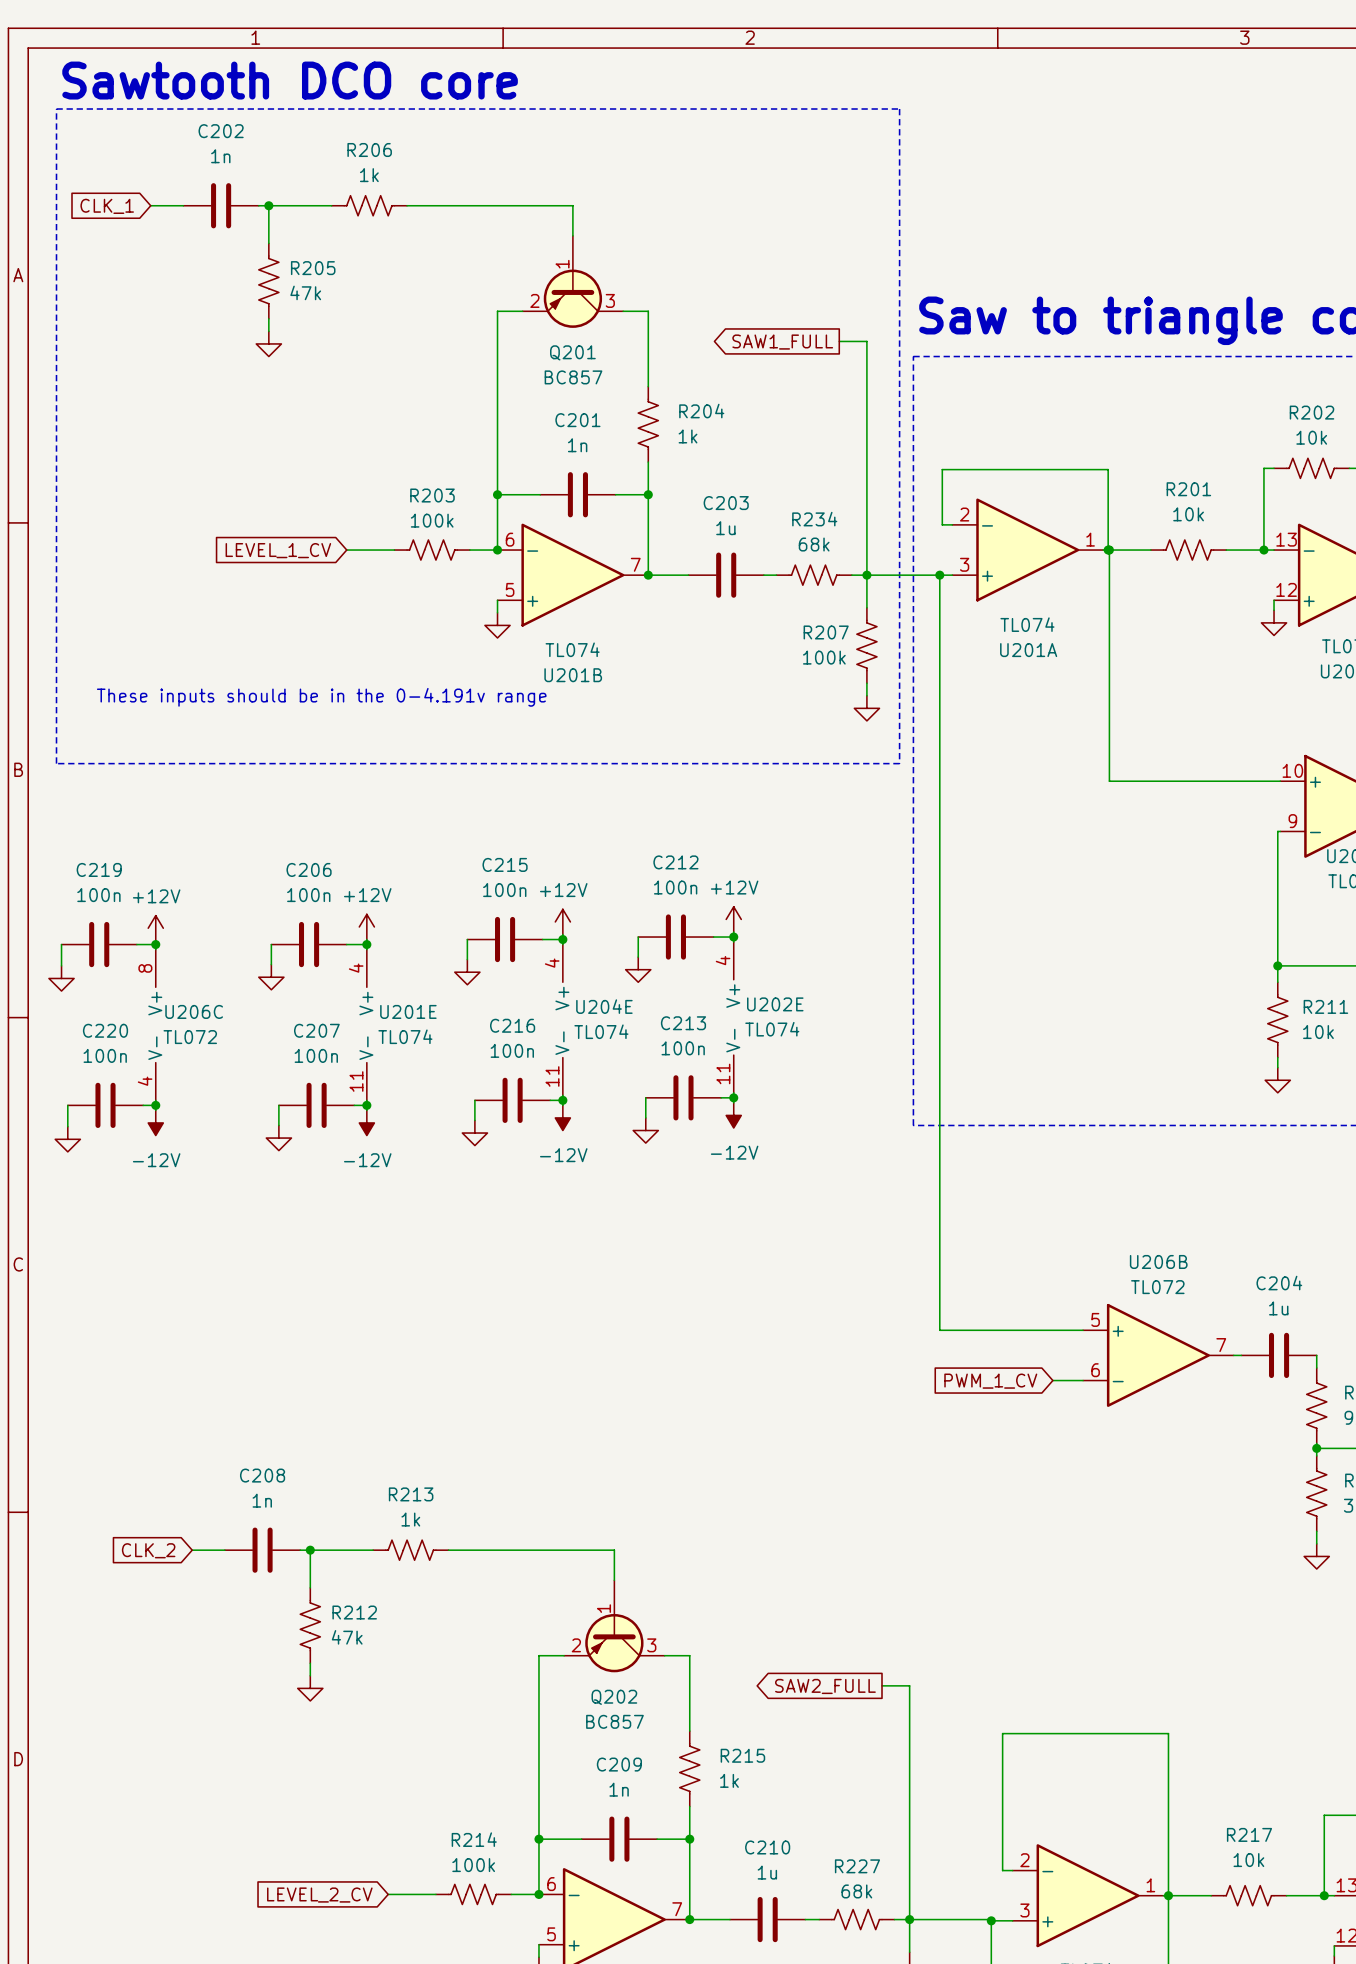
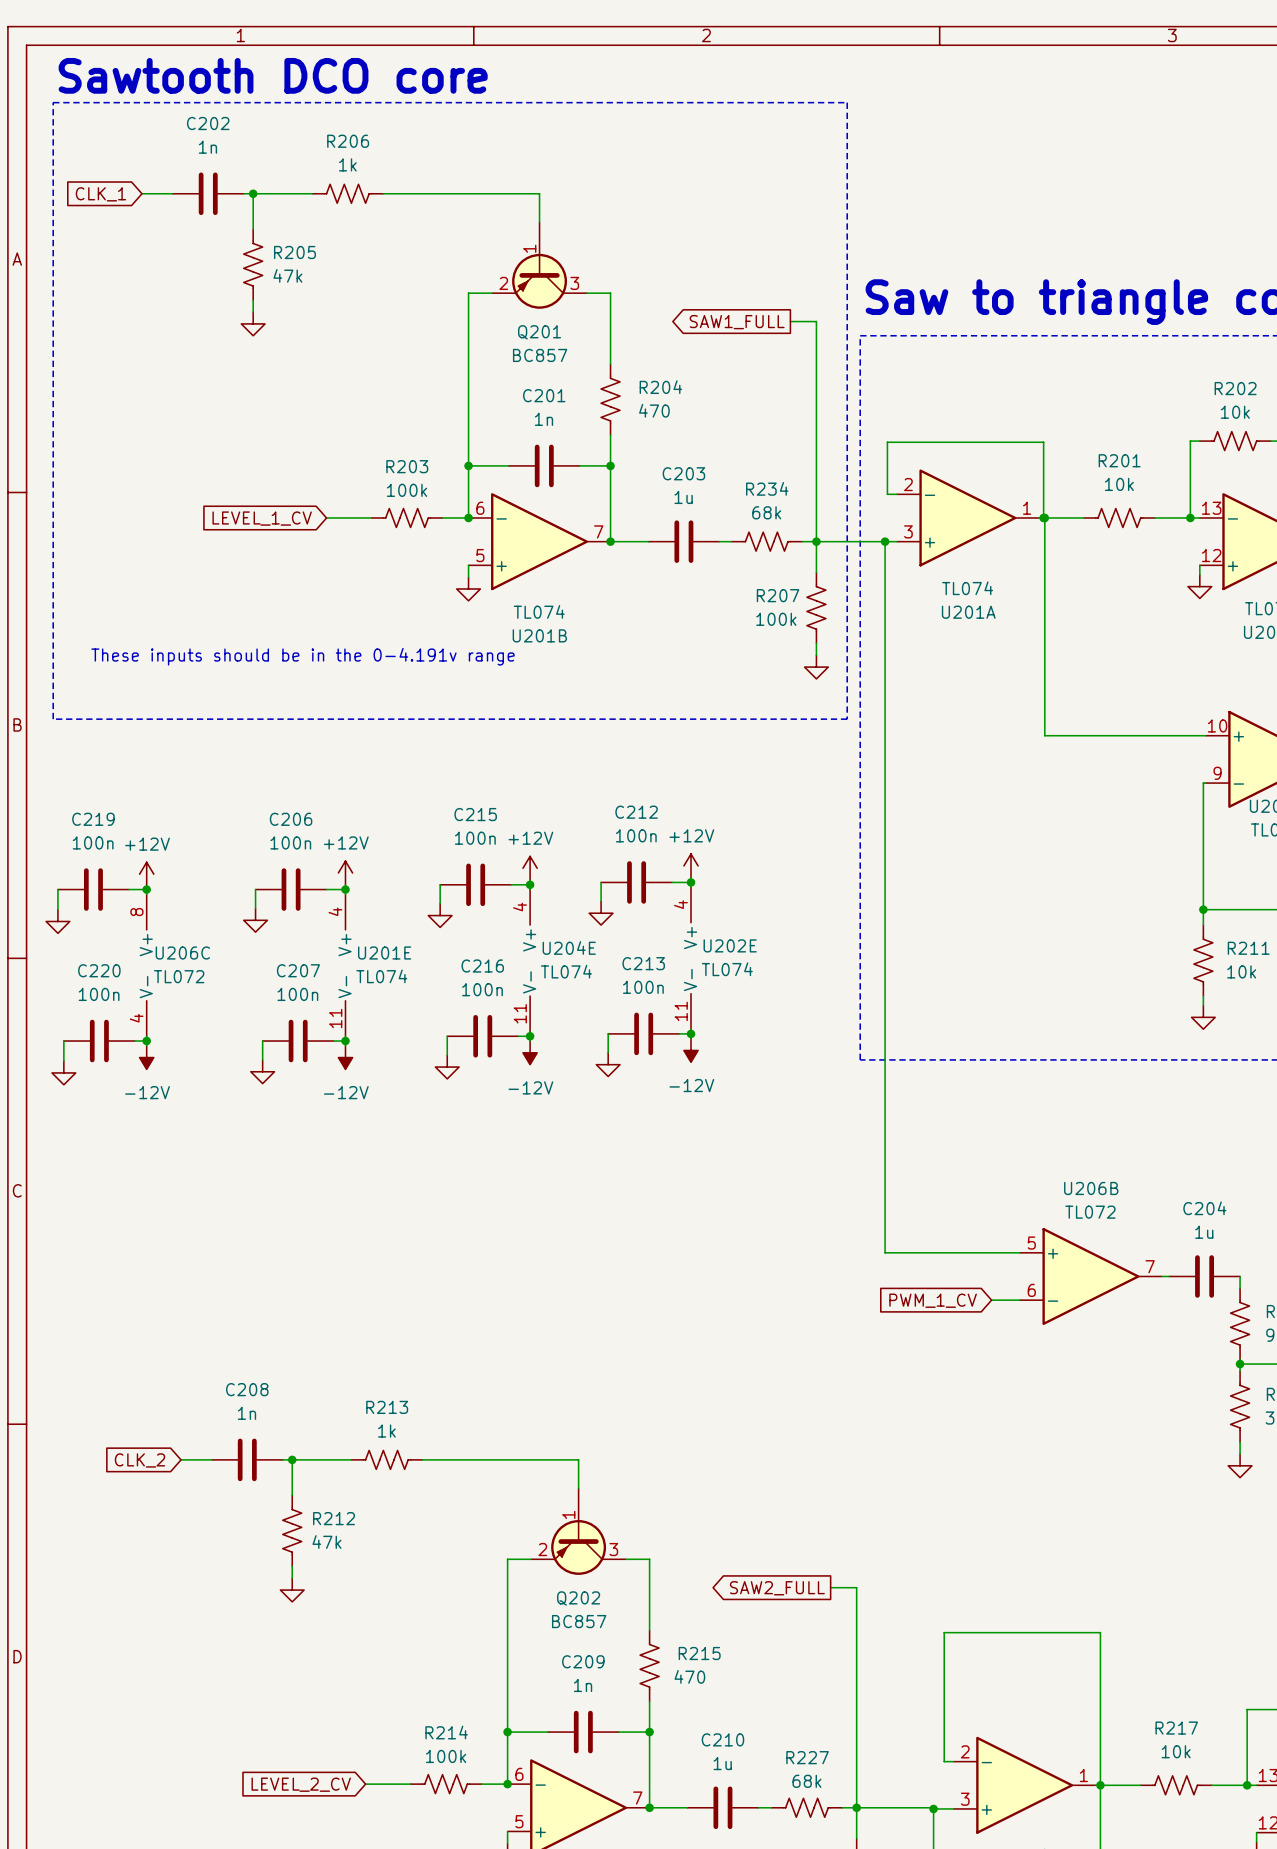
R204 value: 1k (688, 436) -> 470 (654, 410)
R215 value: 1k (729, 1780) -> 470 (689, 1676)

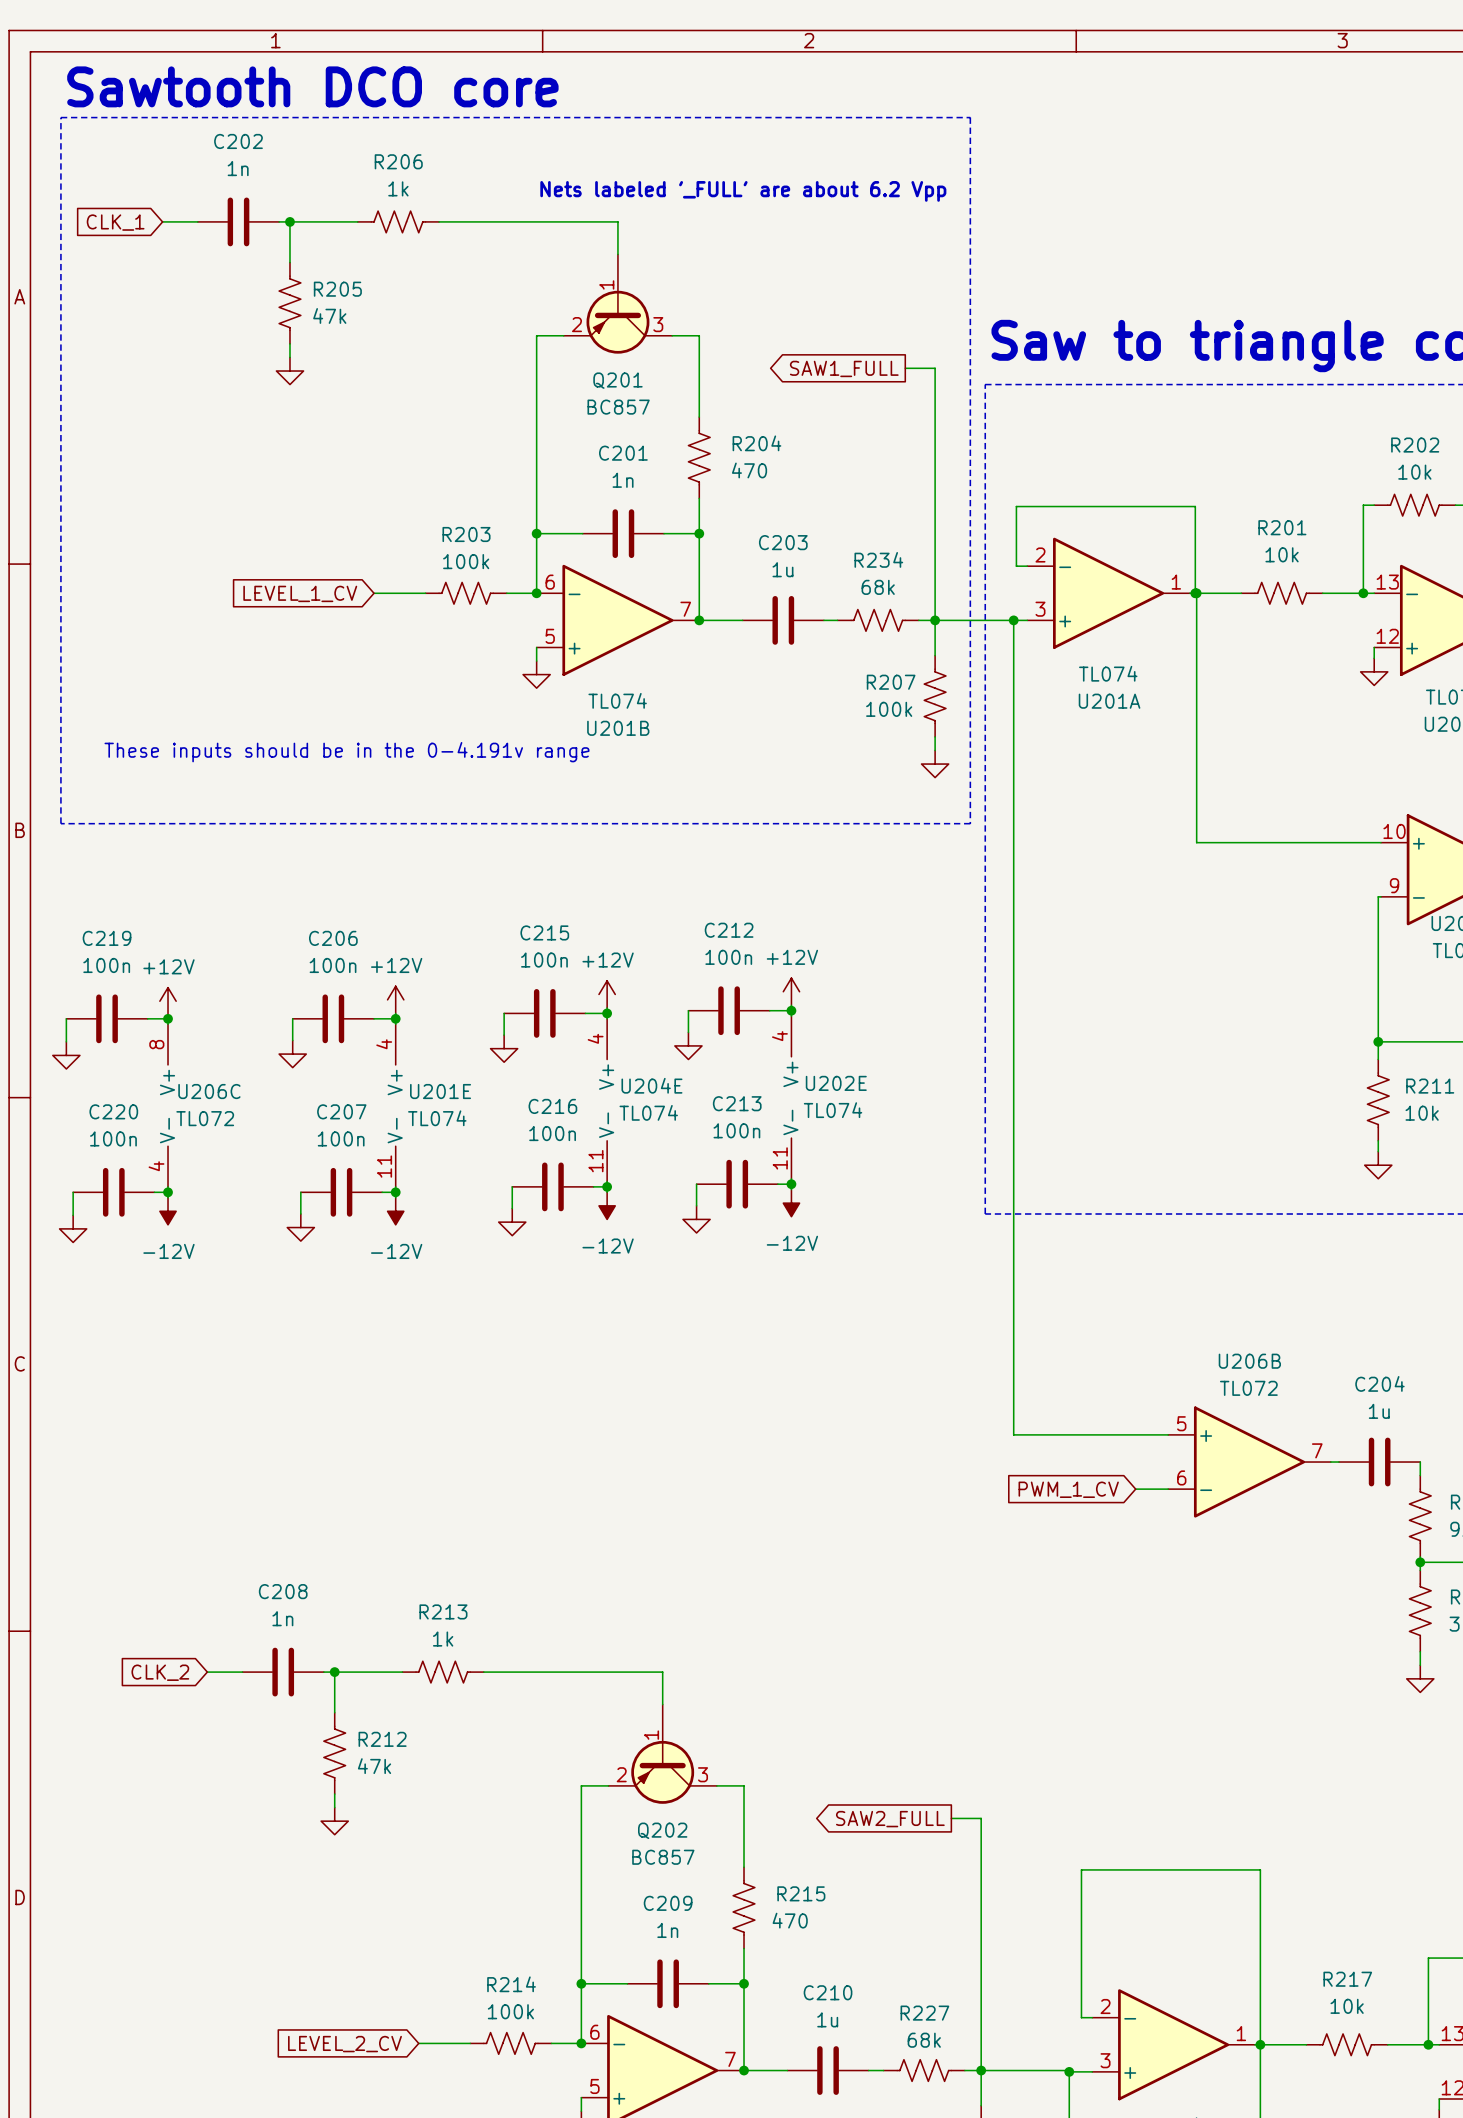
text: none -> Nets labeled '_FULL' are about 6.2 Vpp (743, 191)

